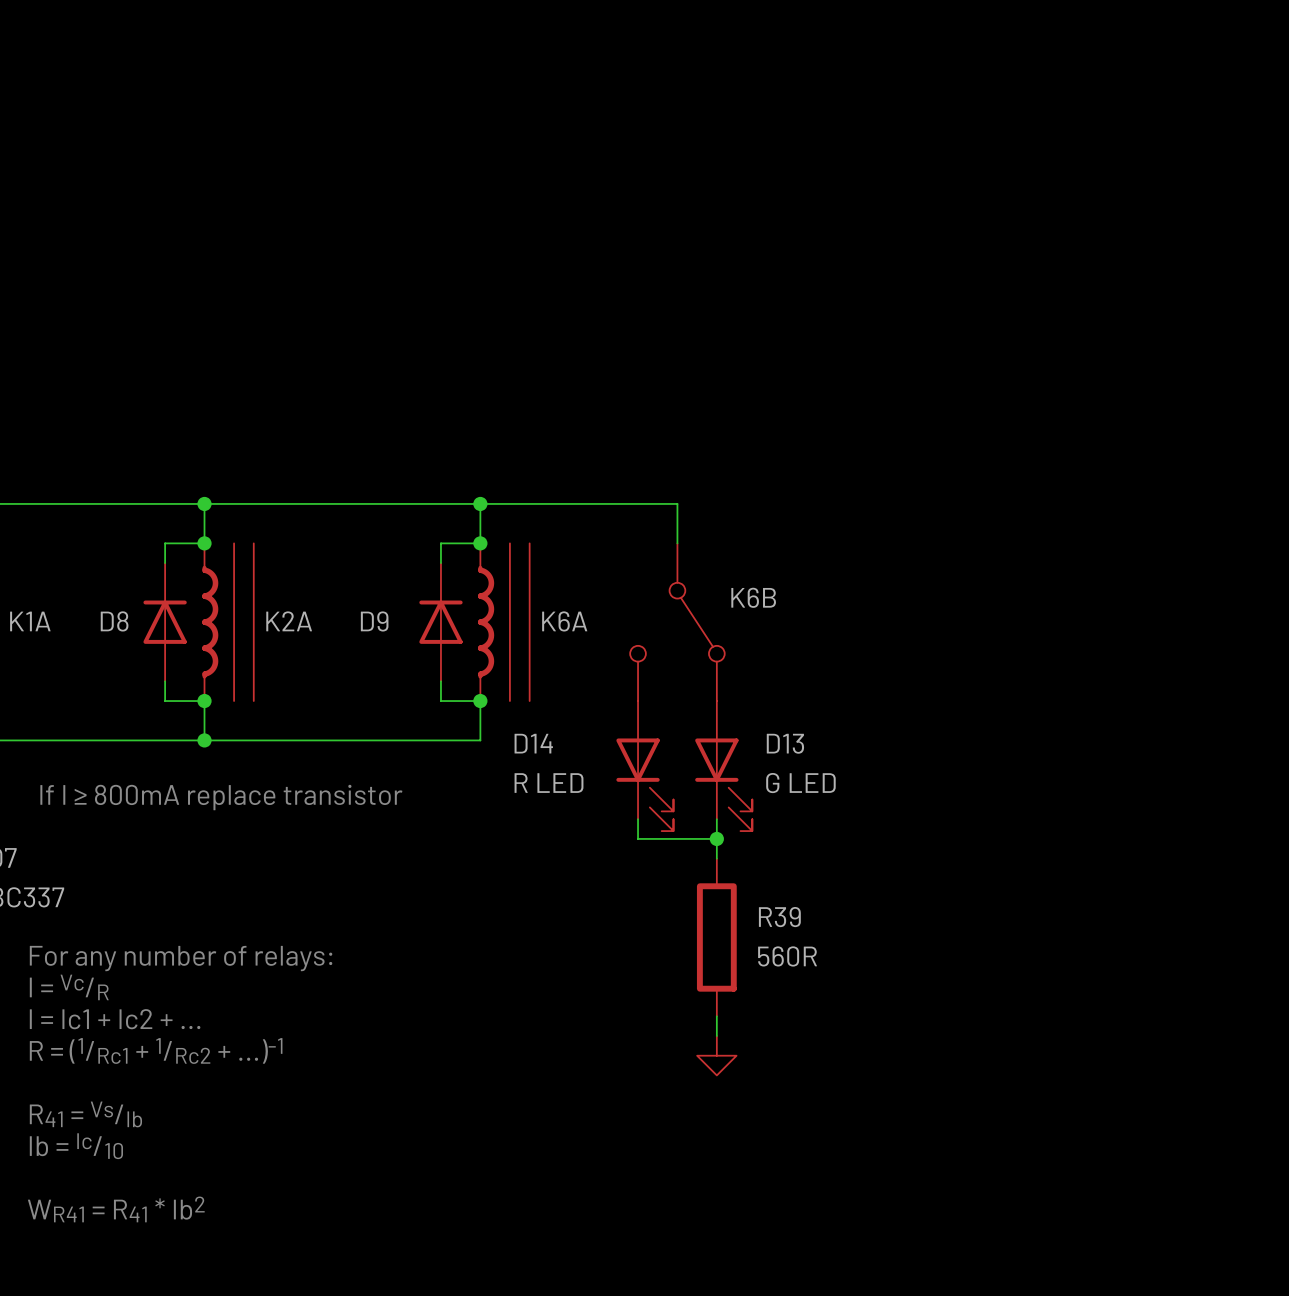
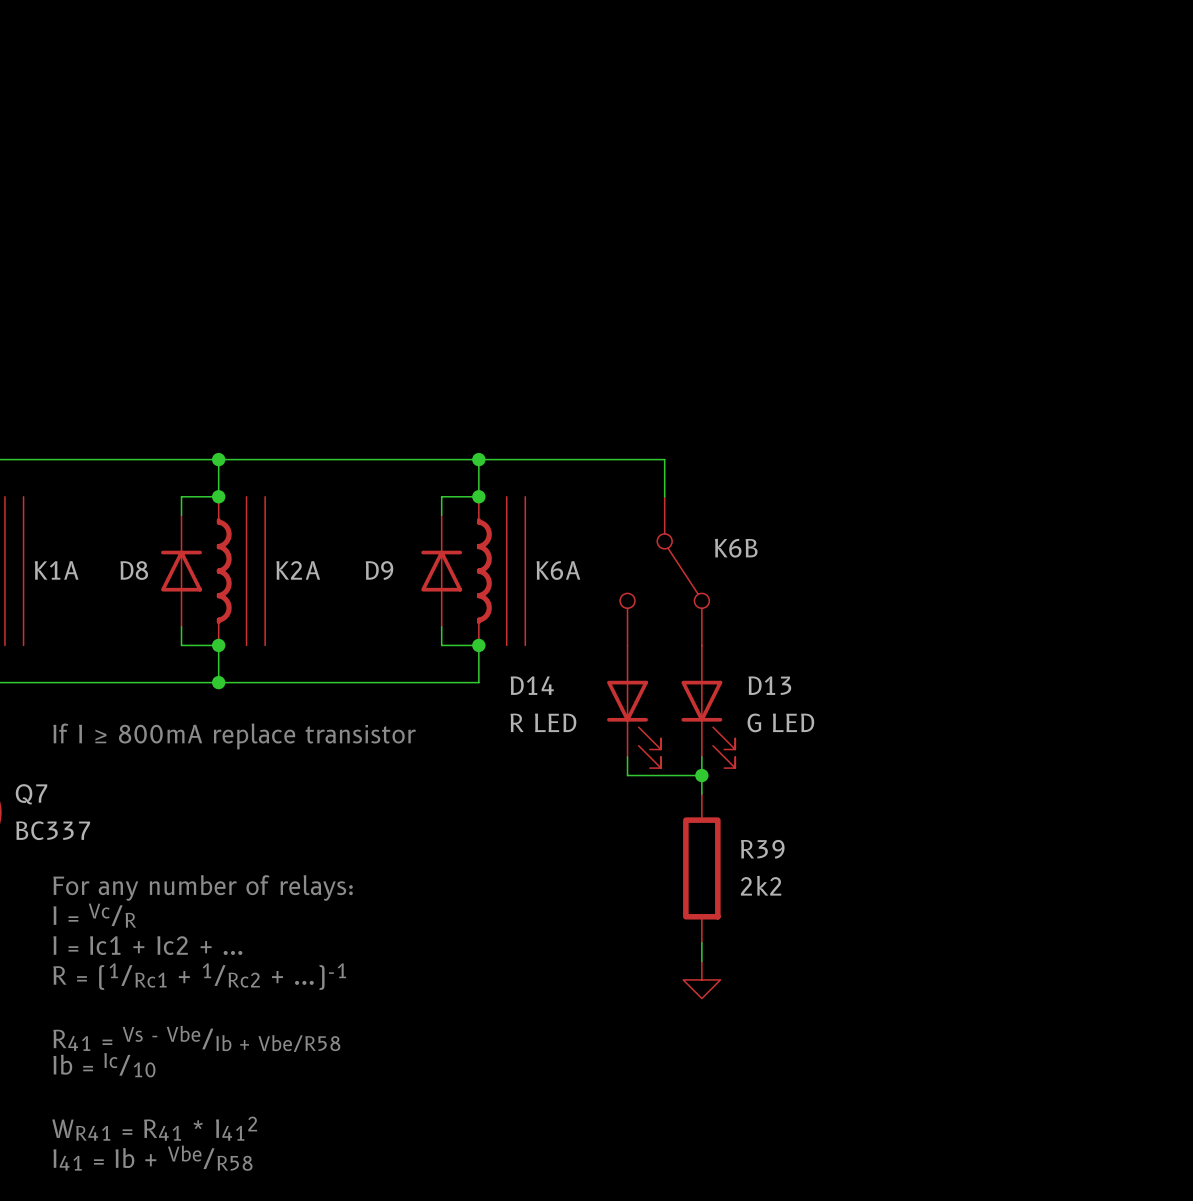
R39 value: 560R (787, 956) -> 2k2 (761, 885)
text: R41 = Vs/Ib (85, 1114) -> R41 = Vs - Vbe/Ib + Vbe/R58 (196, 1038)
text: WR41 = R41 * Ib2 (116, 1209) -> WR41 = R41 * I412 (154, 1128)
text: none -> I41 = Ib + Vbe/R58 (152, 1158)

